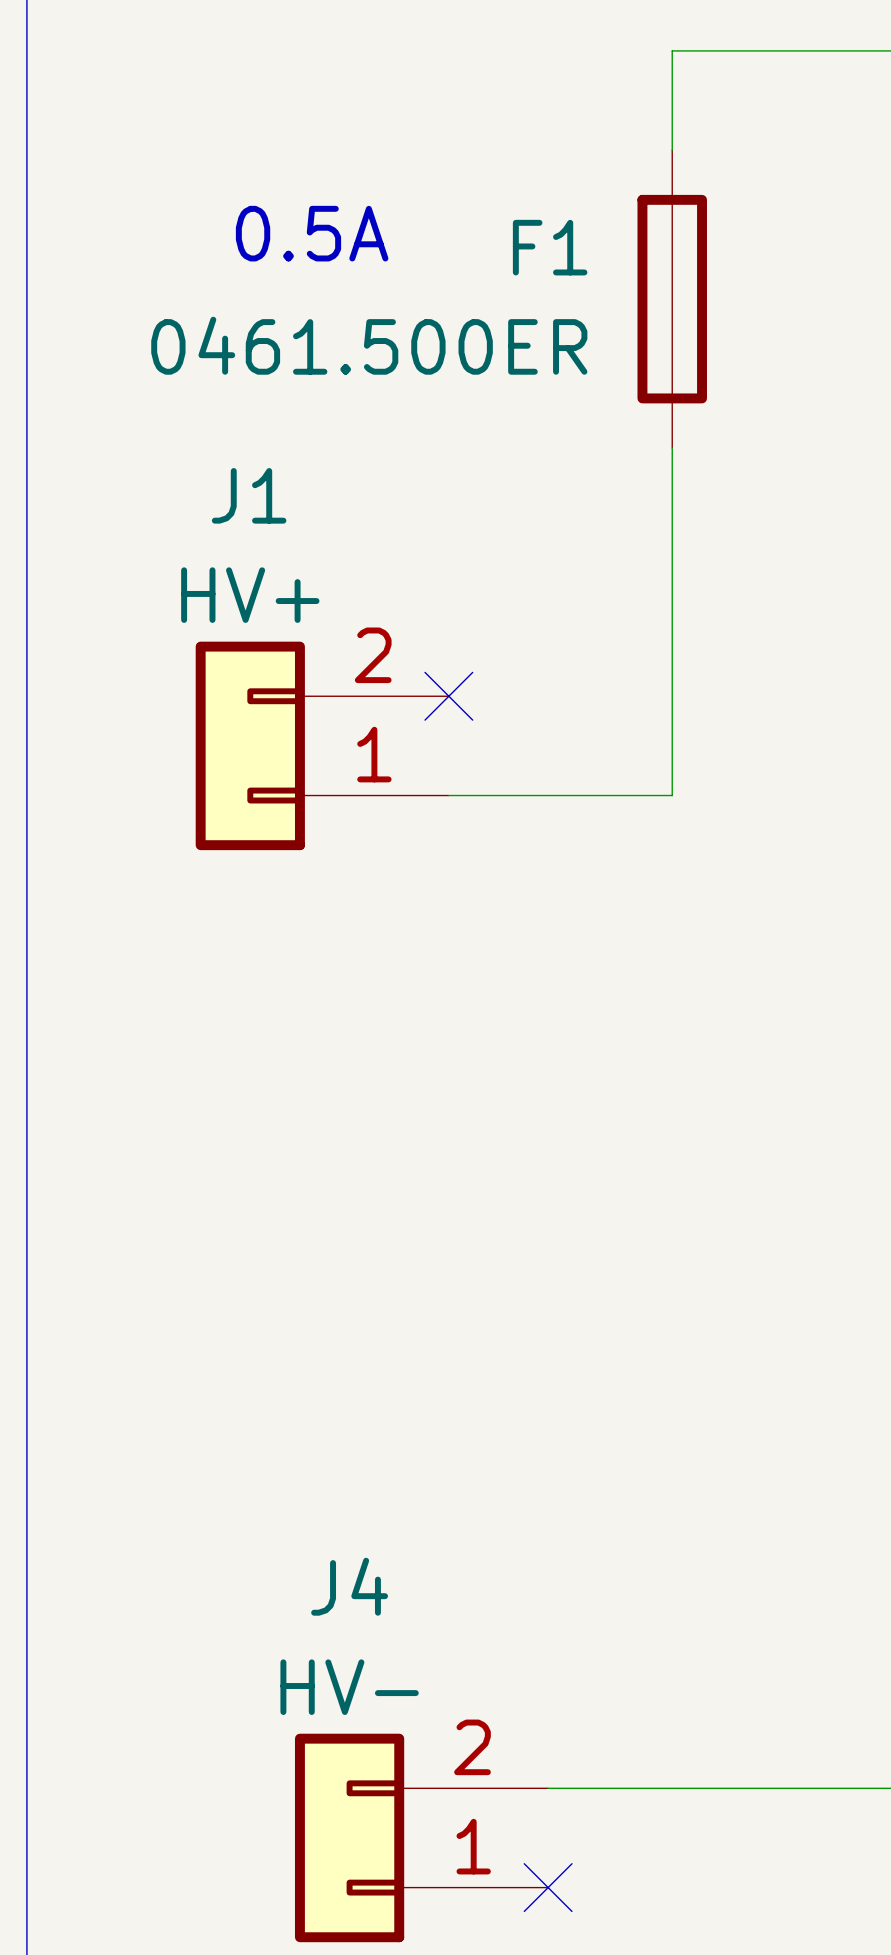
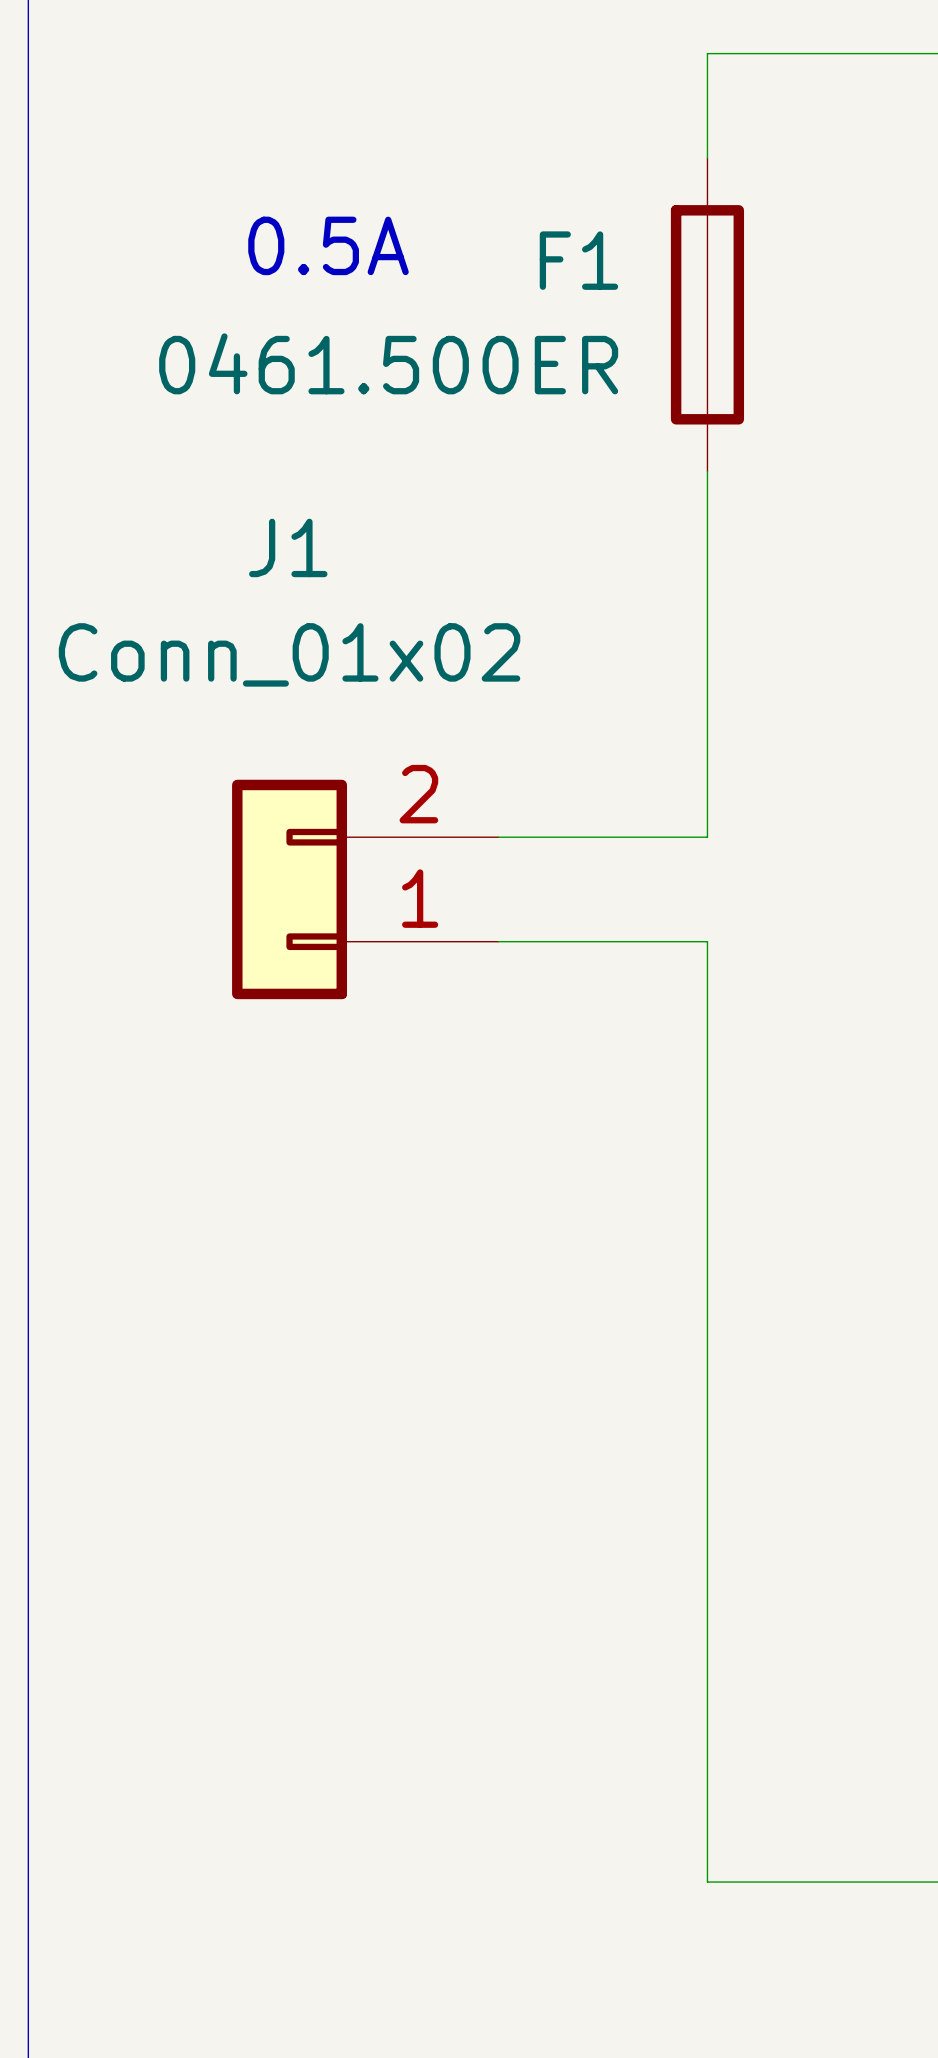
J1 name position: J1 (249, 495) -> J1 (288, 547)
J1 value: HV+ (250, 595) -> Conn_01x02 (289, 654)
no-connect mark: (448, 696) -> none
J1 position: (322, 745) -> (365, 889)
wire: (548, 1788) (672, 1788) -> (498, 941) (707, 941) (707, 1882)
J4: HV- (421, 1837) -> none
no-connect mark: (548, 1887) -> none

